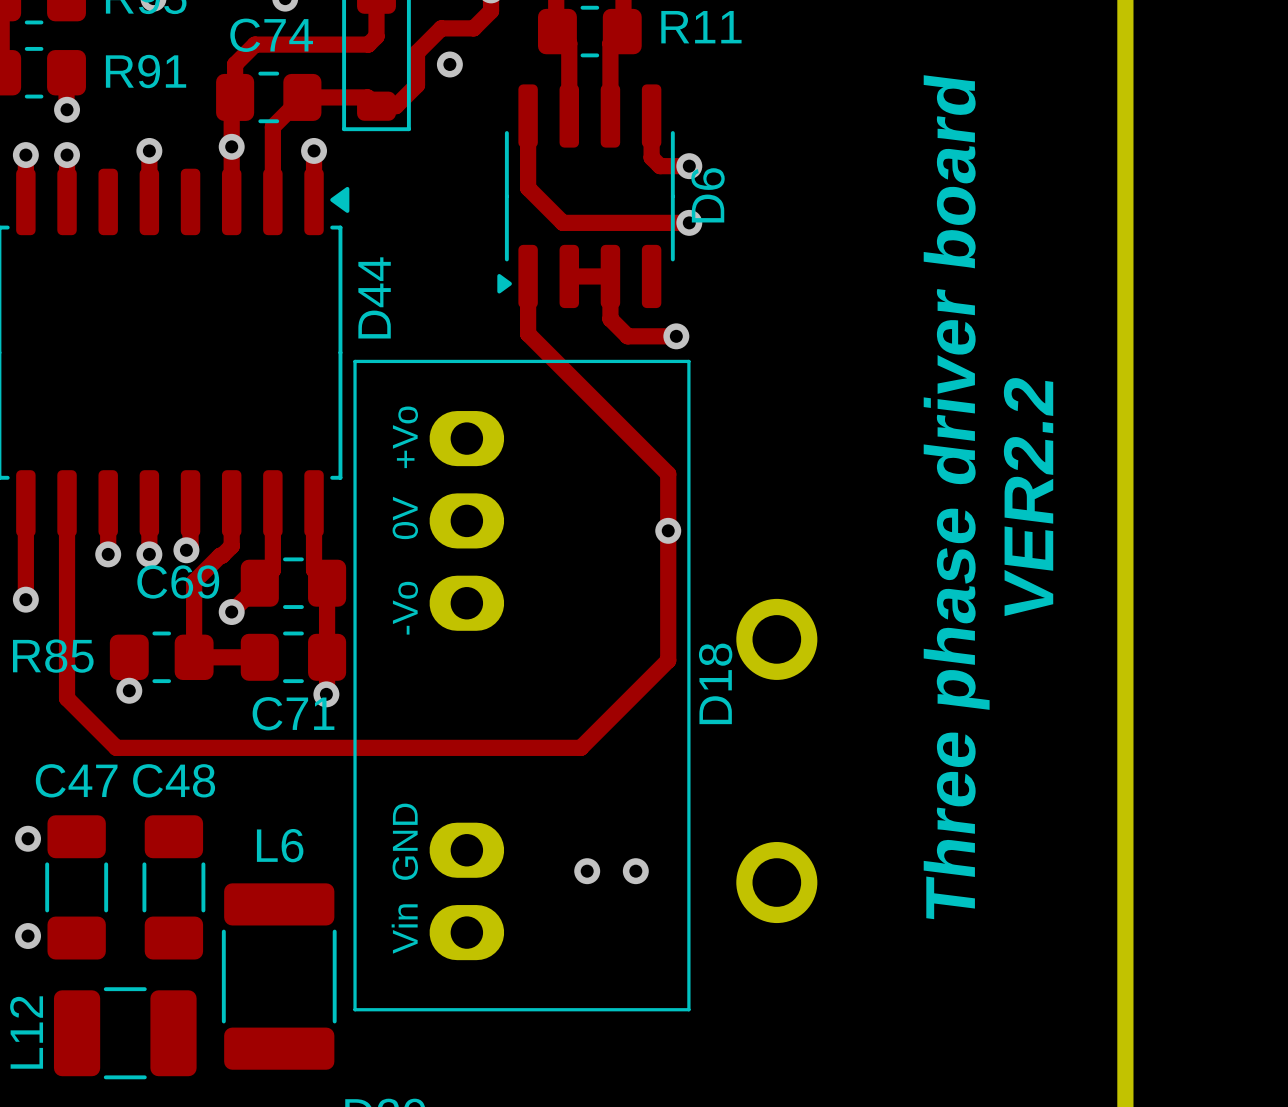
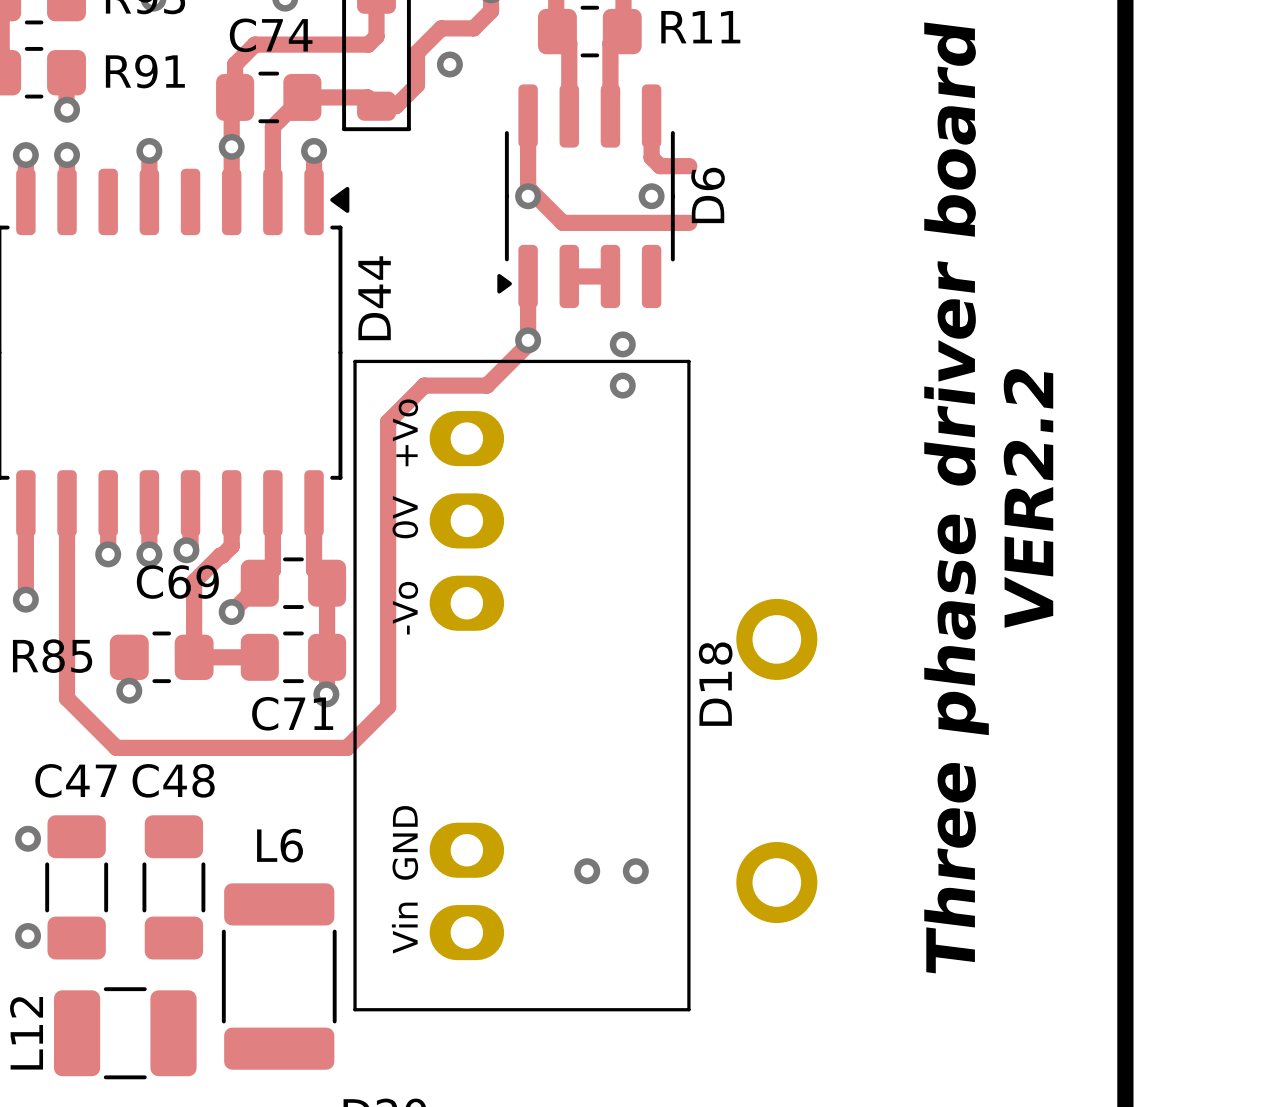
via: (689, 166) -> none
via: none -> (528, 196)
via: none -> (651, 196)
via: (689, 222) -> none
track: (610, 276) (610, 319) (627, 336) (676, 336) -> none
track: (528, 333) (668, 474) (668, 660) (580, 747) (346, 747) -> (528, 333) (528, 344) (486, 385) (424, 385) (388, 421) (388, 706) (346, 747)
via: (676, 336) -> none
via: none -> (528, 340)
via: none -> (622, 344)
via: none -> (622, 385)
via: (668, 530) -> none

